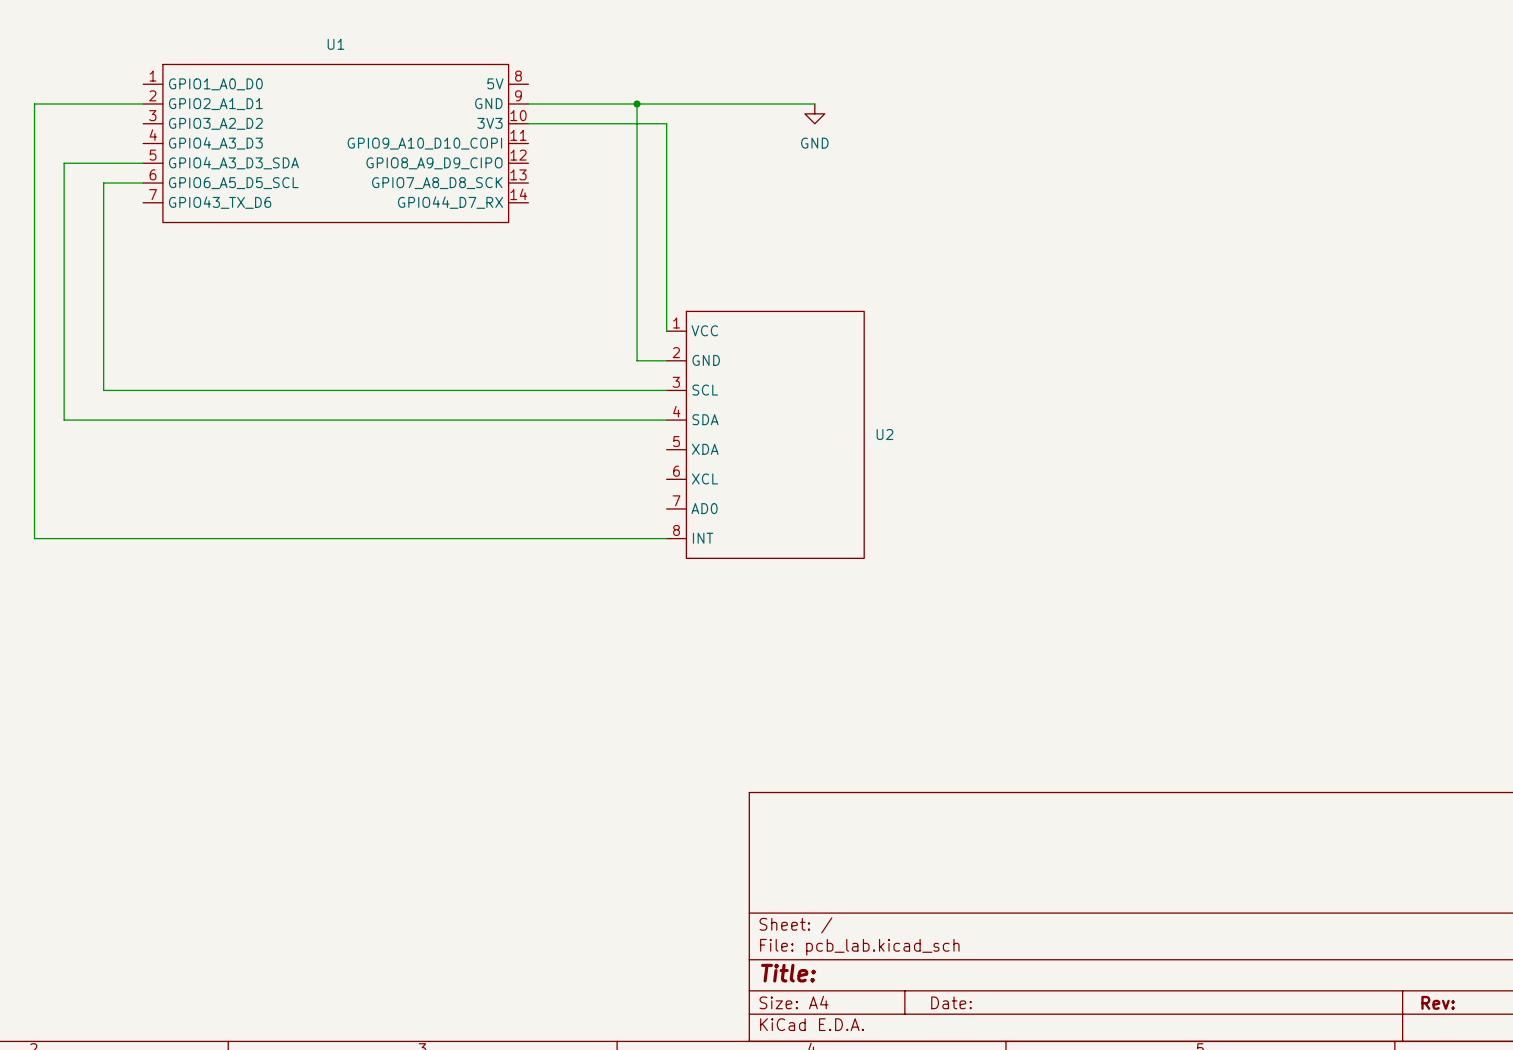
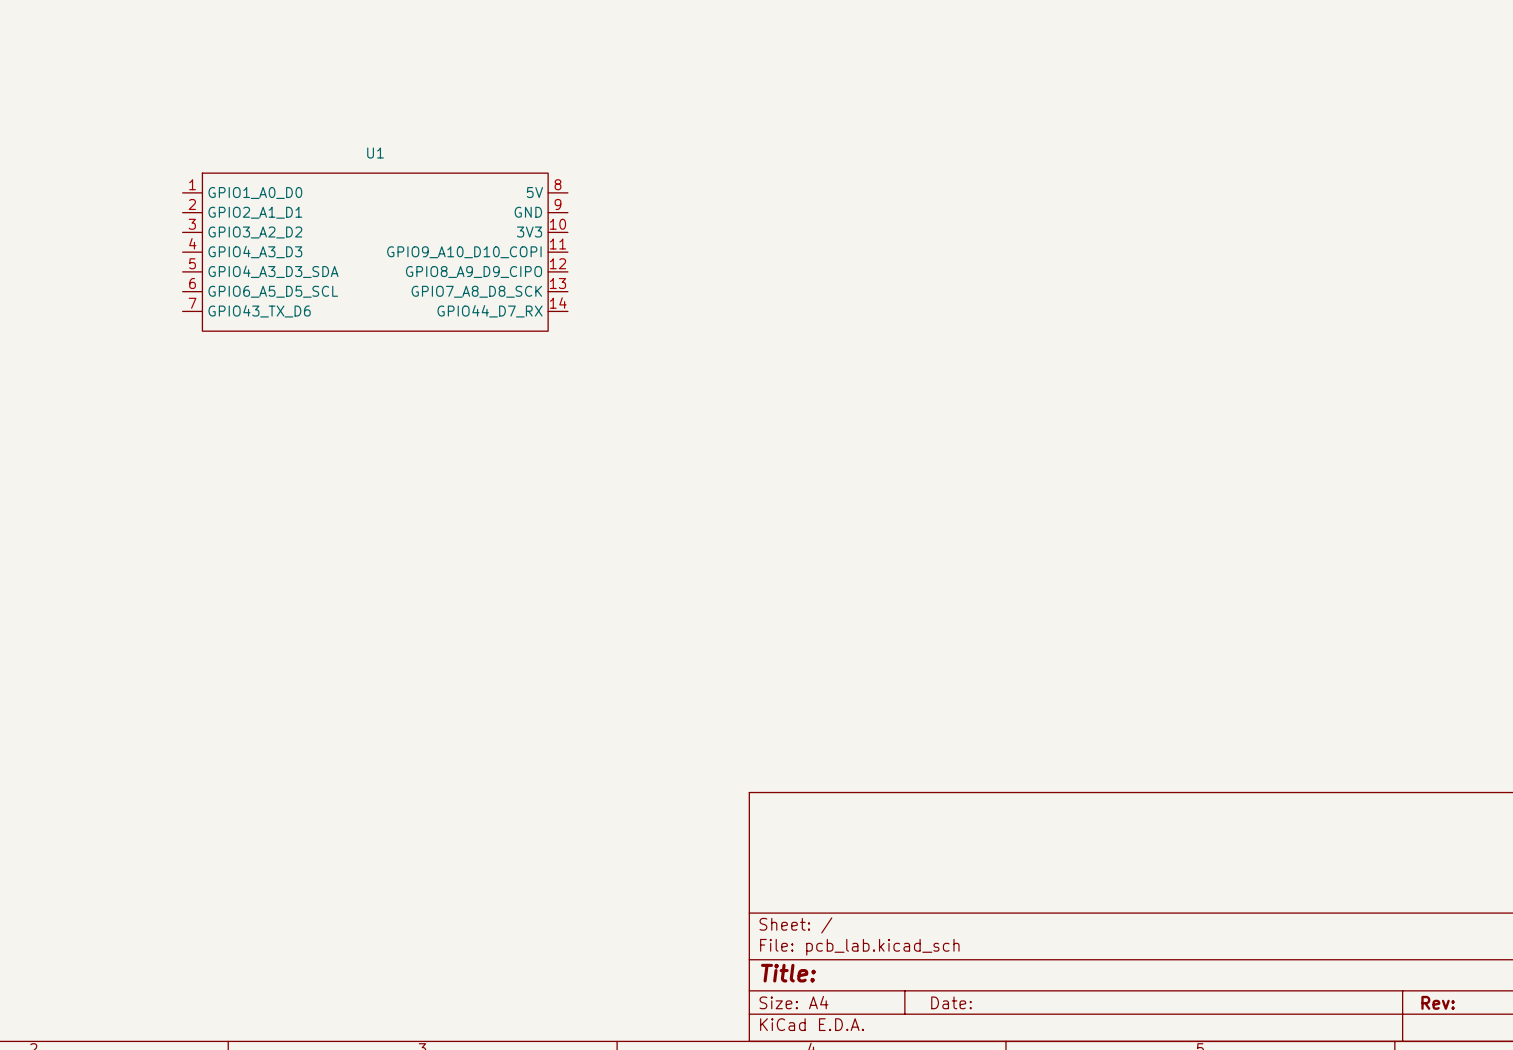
wire: (143, 103) (34, 103) (34, 538) (666, 538) -> none
wire: (528, 103) (814, 103) -> none
wire: (637, 103) (637, 360) (666, 360) -> none
junction: (637, 103) -> none
power symbol: GND (814, 113) -> none
wire: (528, 123) (666, 123) (666, 331) -> none
U1 position: (335, 143) -> (375, 252)
wire: (143, 163) (64, 163) (64, 420) (666, 420) -> none
wire: (143, 183) (103, 183) (103, 390) (666, 390) -> none
U2: (765, 434) -> none

